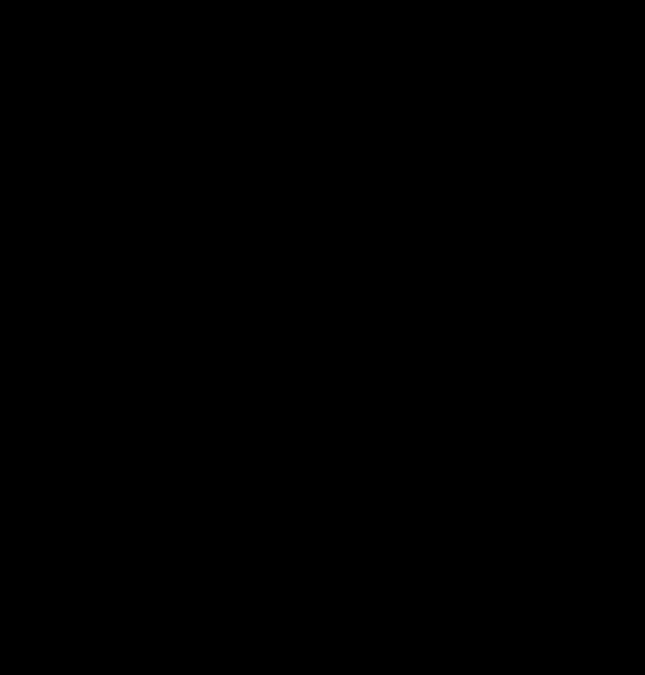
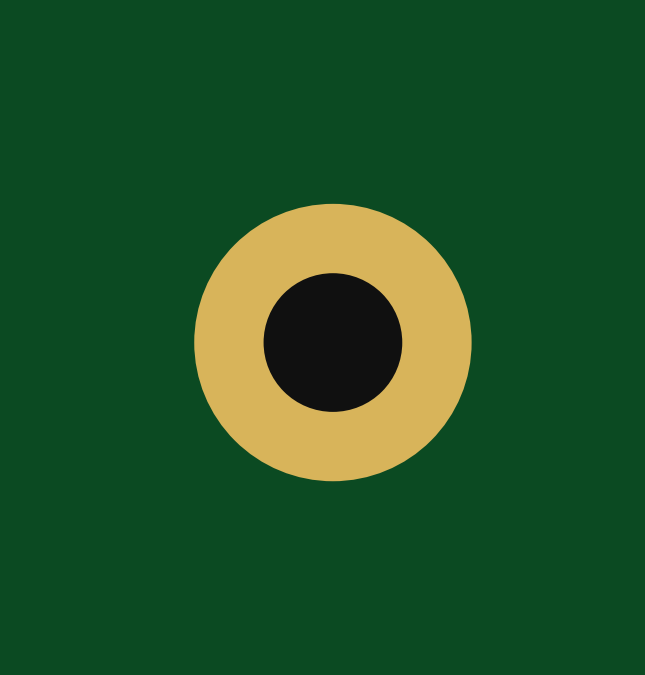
part: none -> (332, 342)

